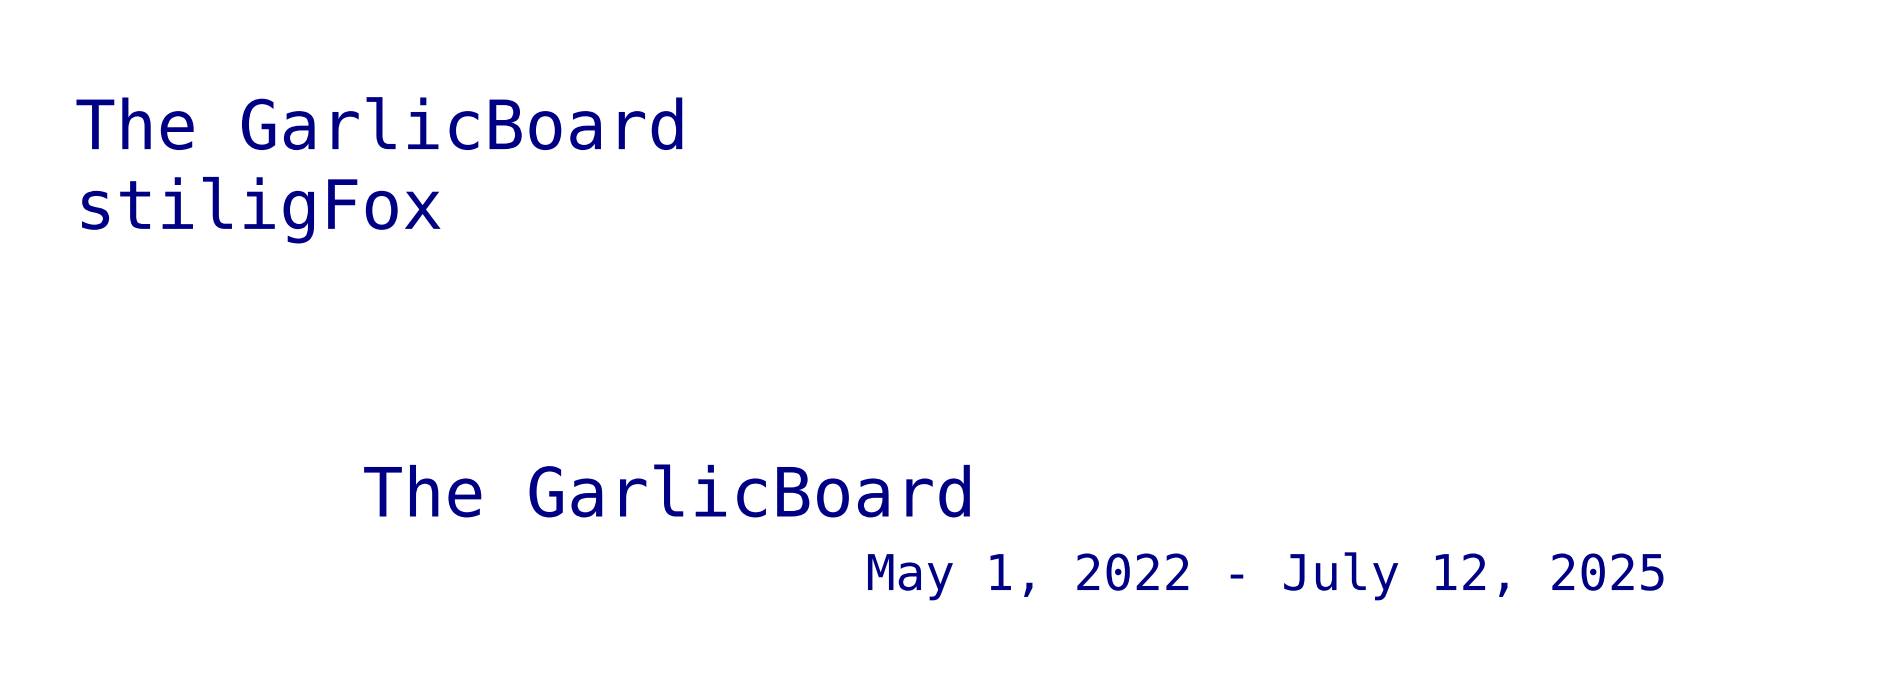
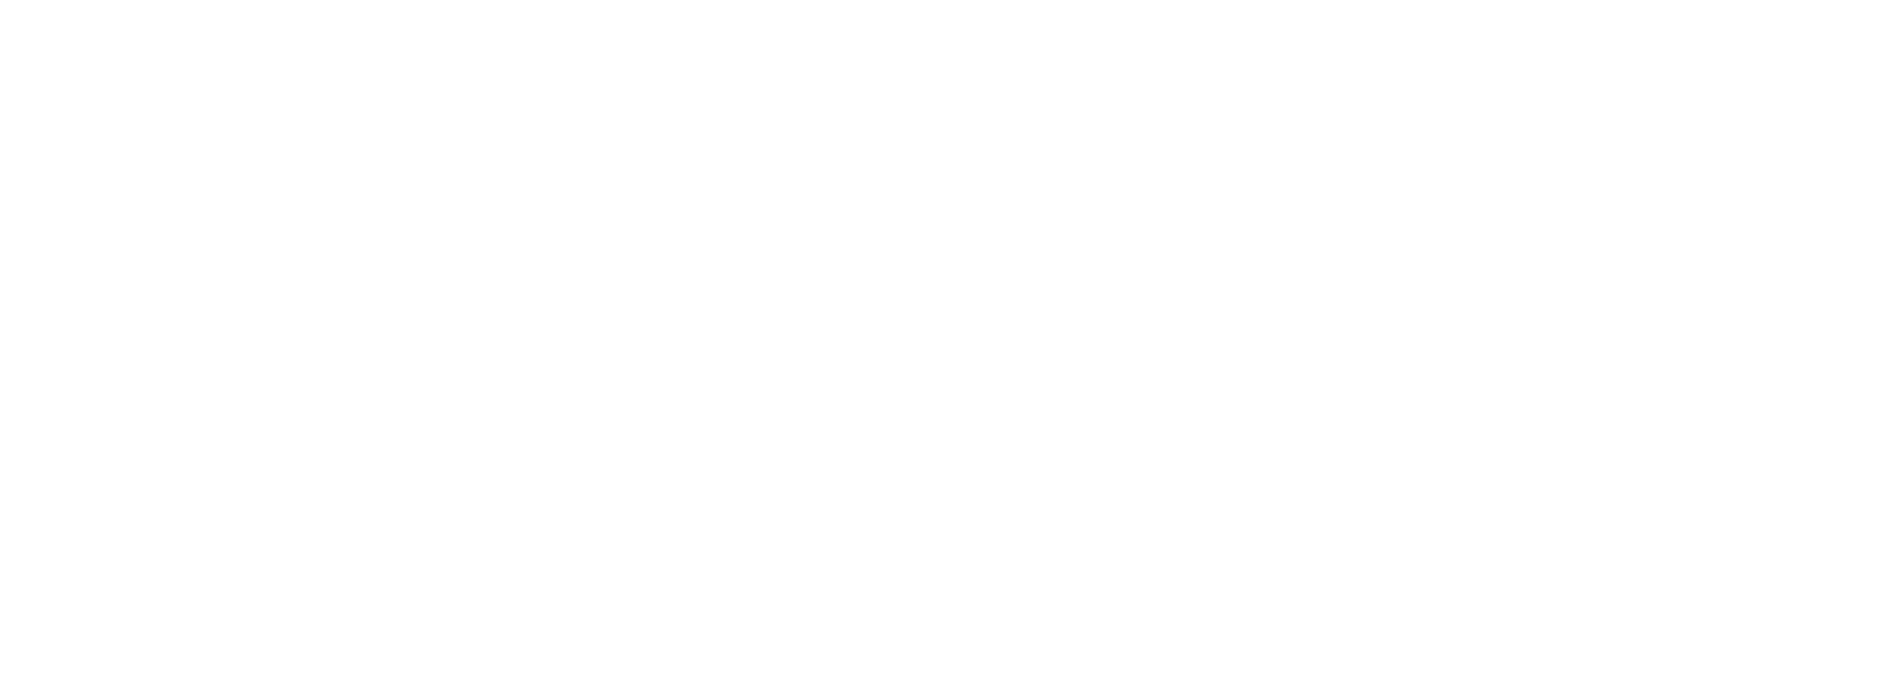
text: The GarlicBoard (379, 123) -> none
text: stiligFox (261, 210) -> none
text: The GarlicBoard (666, 490) -> none
text: May 1, 2022 - July 12, 2025 (1265, 576) -> none

